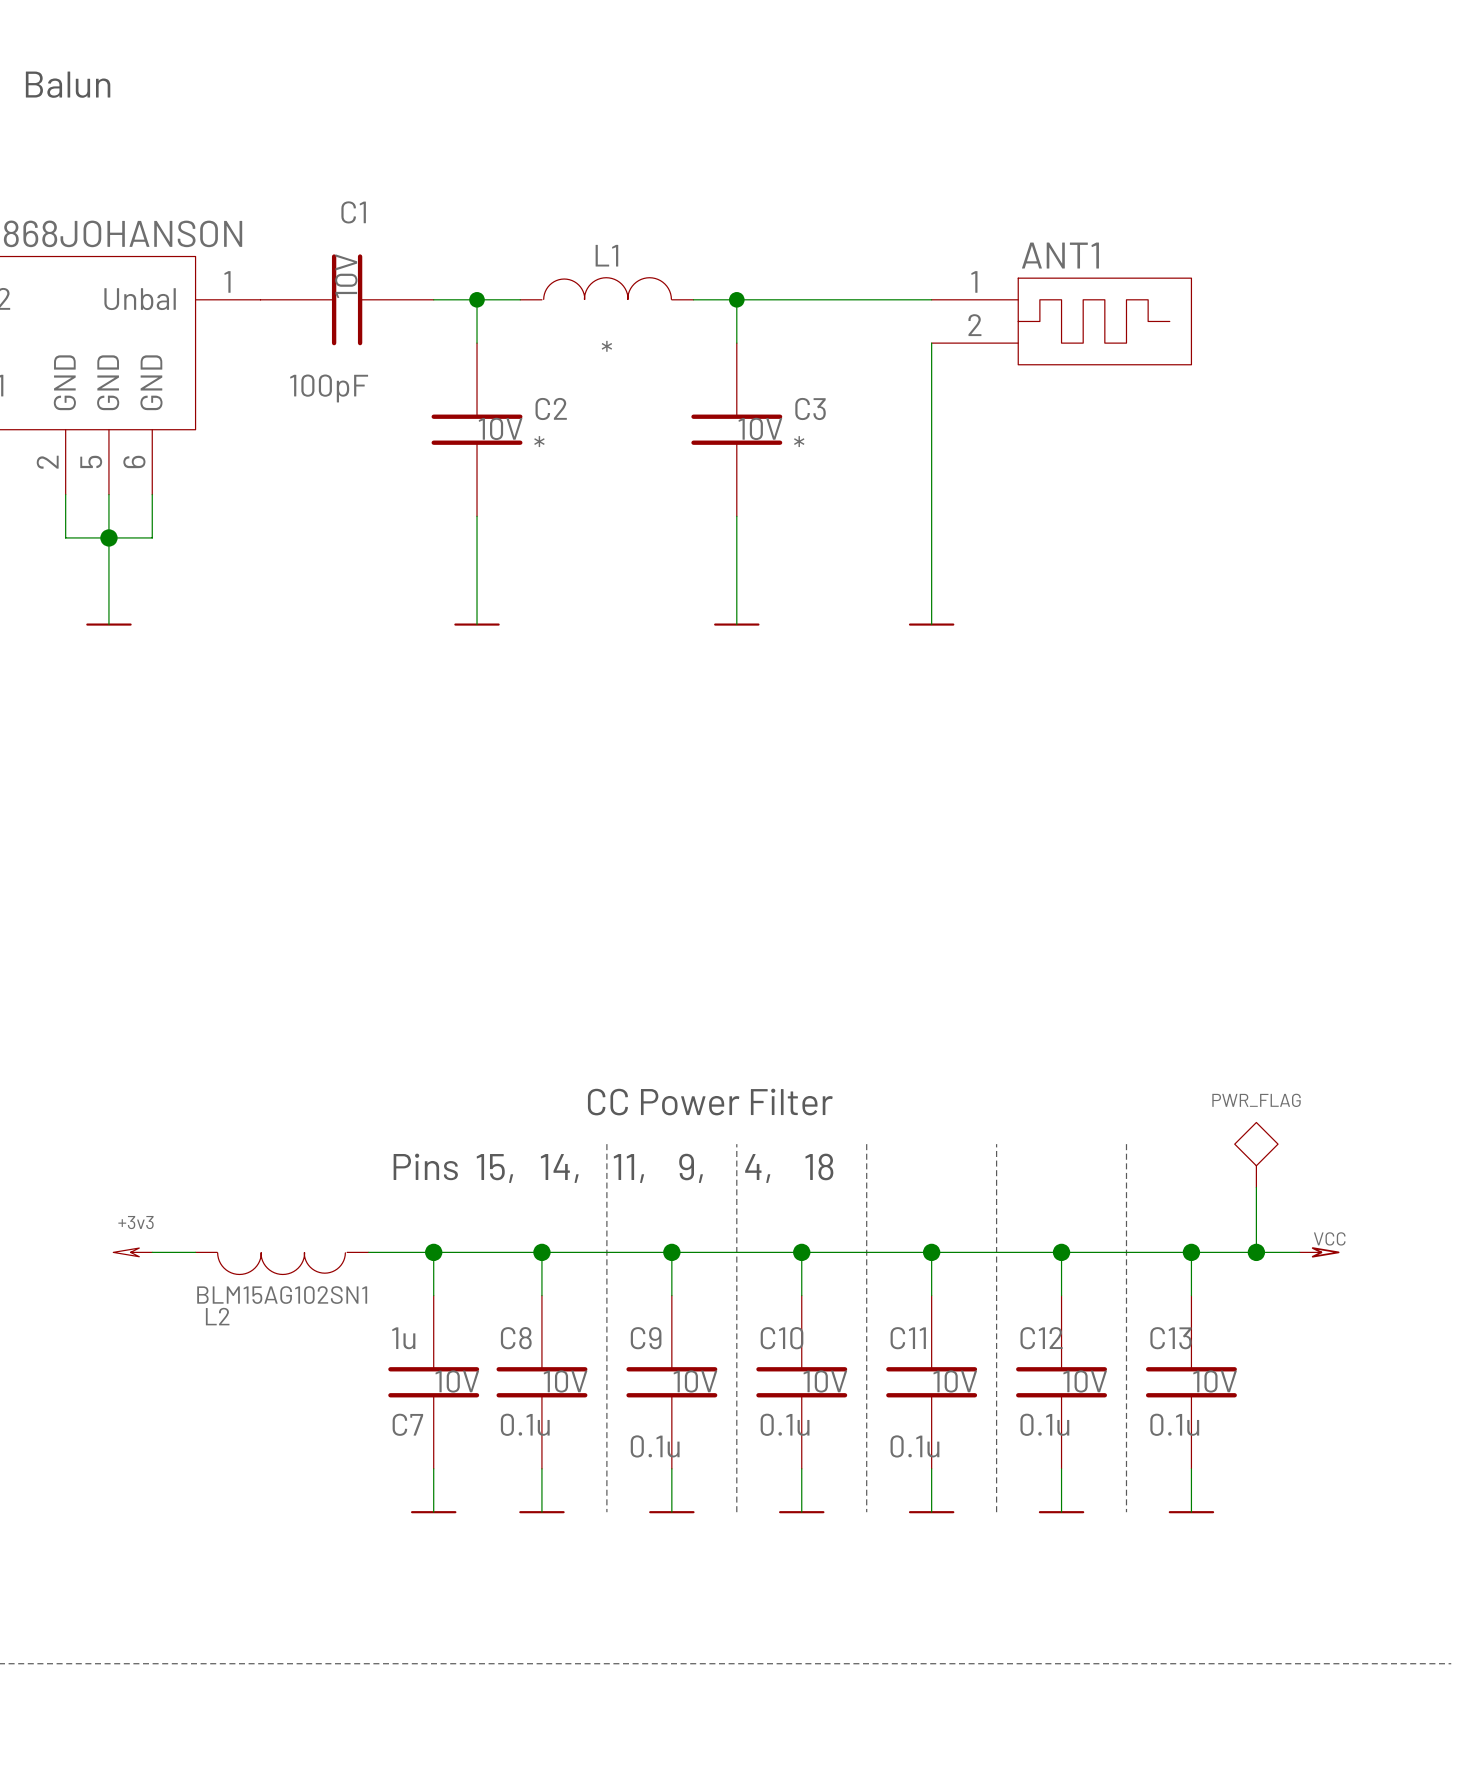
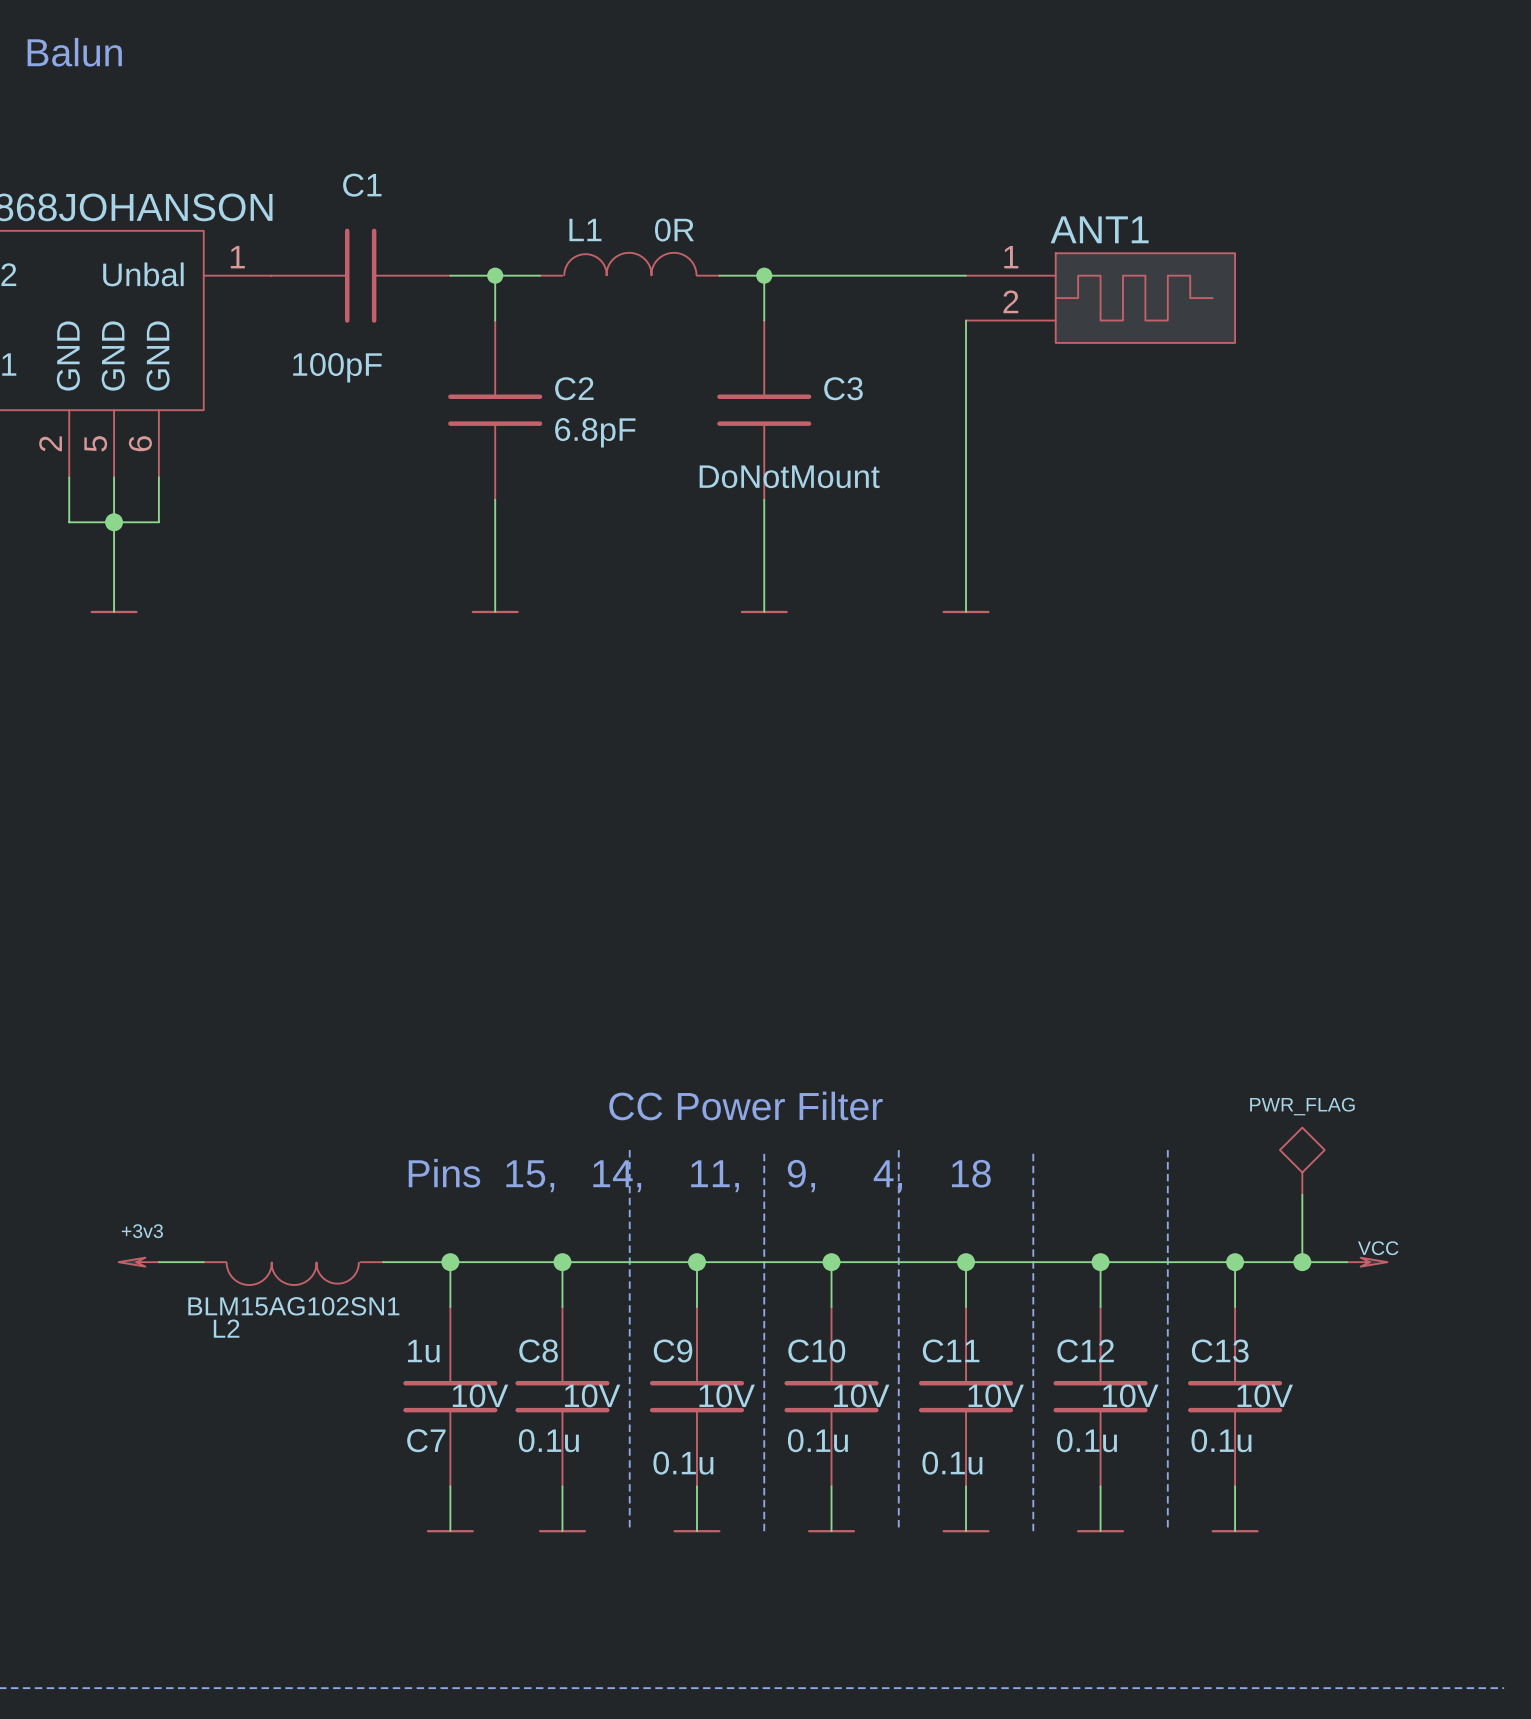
L1 name position: L1 (606, 255) -> L1 (585, 230)
C1 text: 10V (346, 276) -> none
L1 value: * (606, 346) -> 0R (674, 229)
C2 text: 10V (500, 428) -> none
C3 text: 10V (760, 428) -> none
C2 value: * (539, 441) -> 6.8pF (595, 432)
C3 value: * (799, 441) -> DoNotMount (789, 476)

